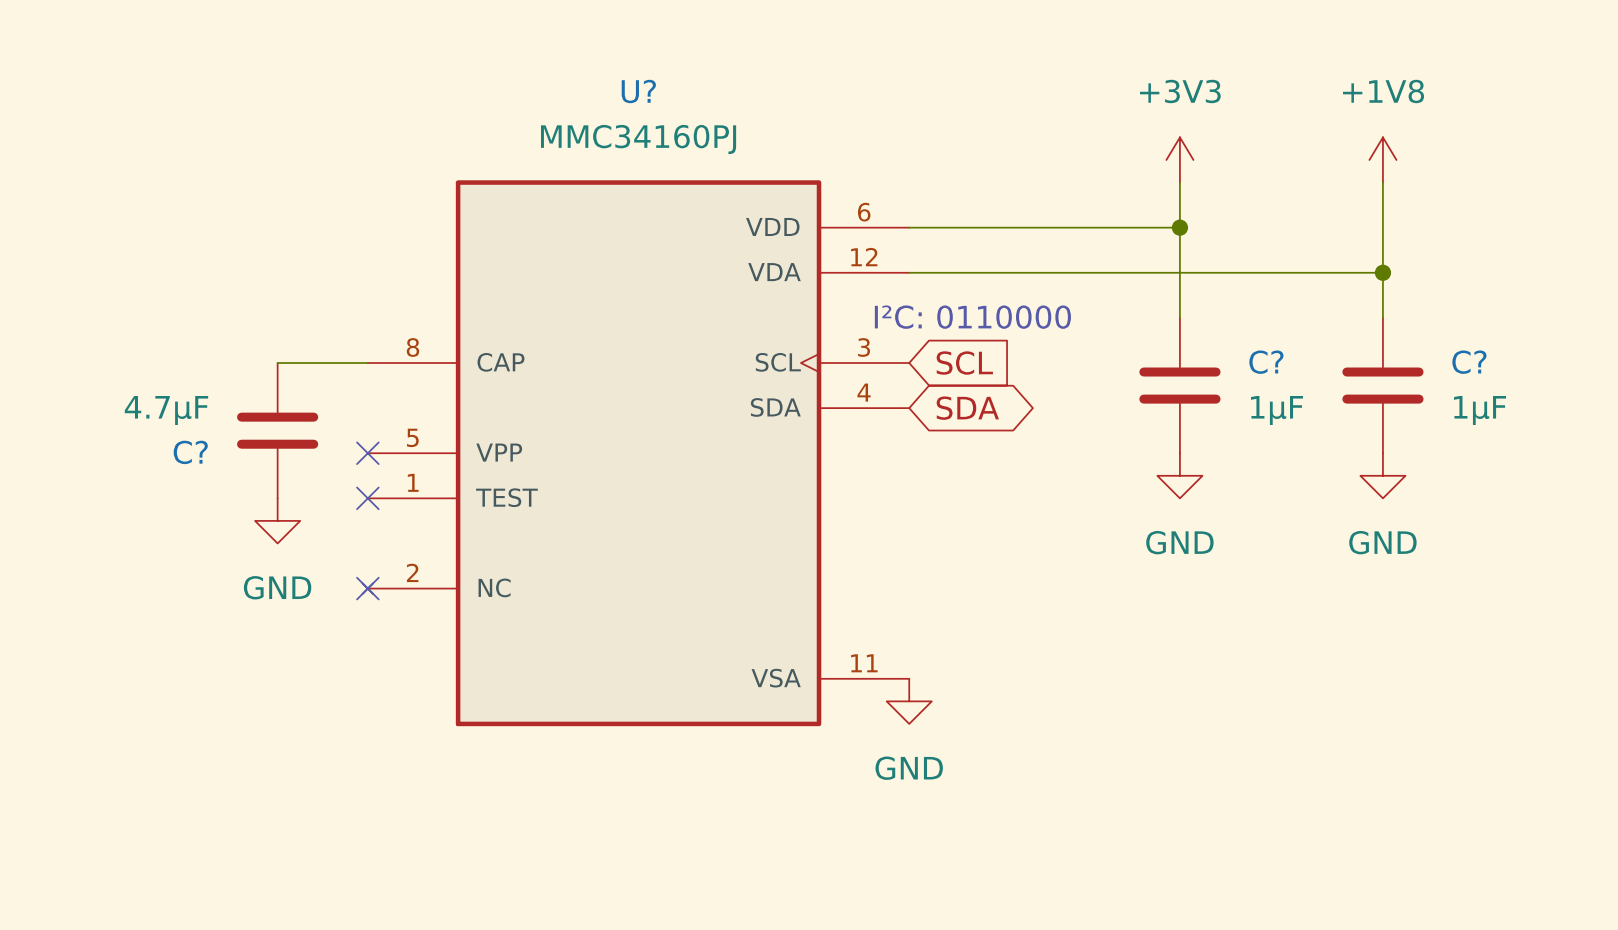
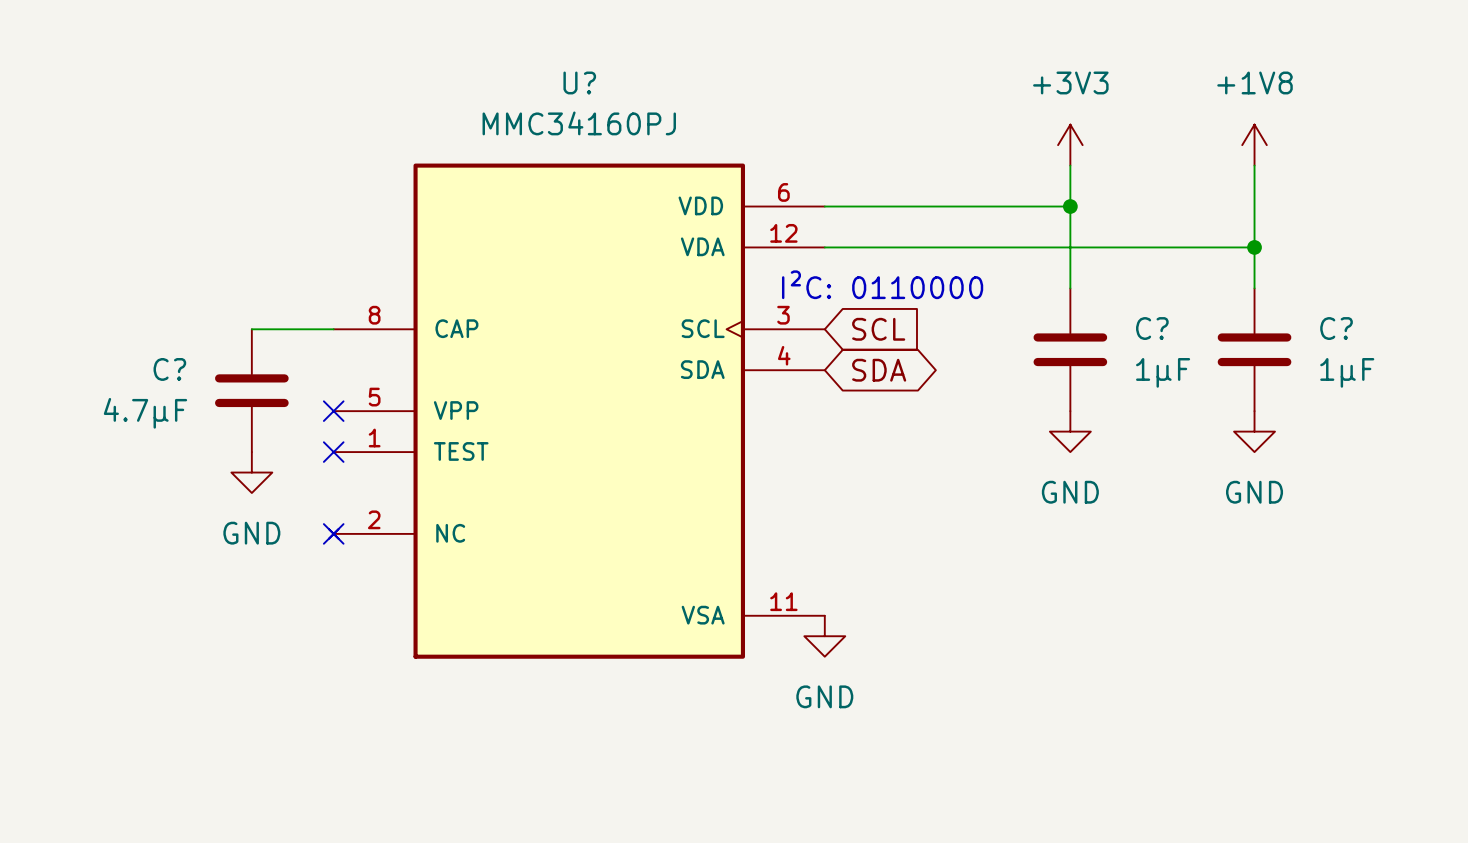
C? value position: 4.7µF (166, 410) -> 4.7µF (145, 413)
C? name position: C? (190, 452) -> C? (169, 369)

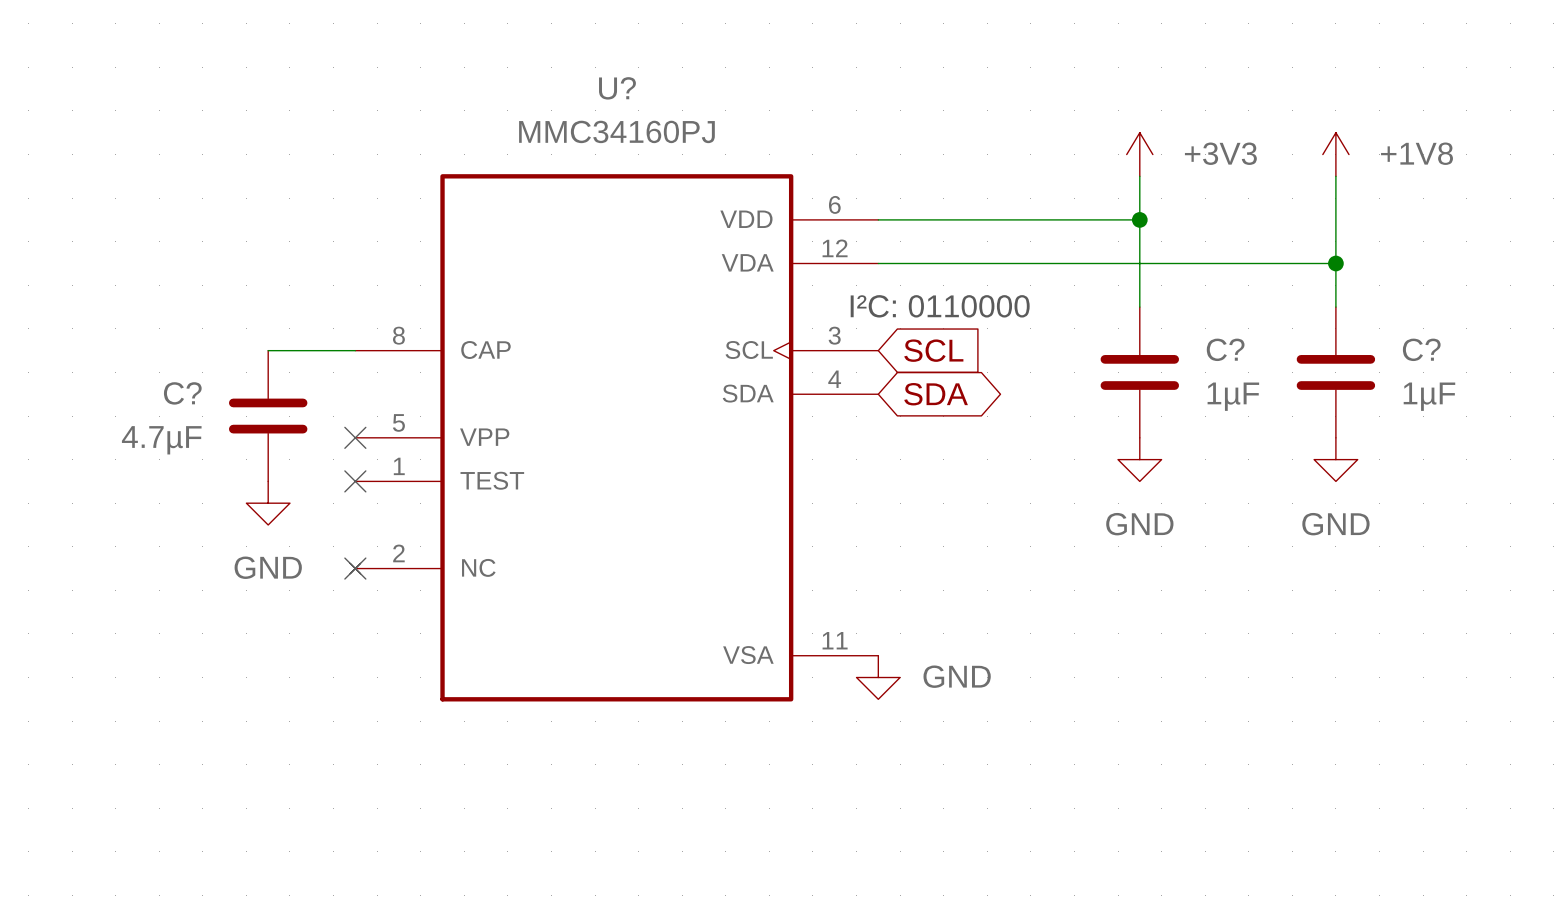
power symbol text position: +3V3 (1070, 82) -> +3V3 (1220, 153)
power symbol text position: +1V8 (1255, 82) -> +1V8 (1417, 153)
power symbol text position: GND (824, 696) -> GND (957, 676)

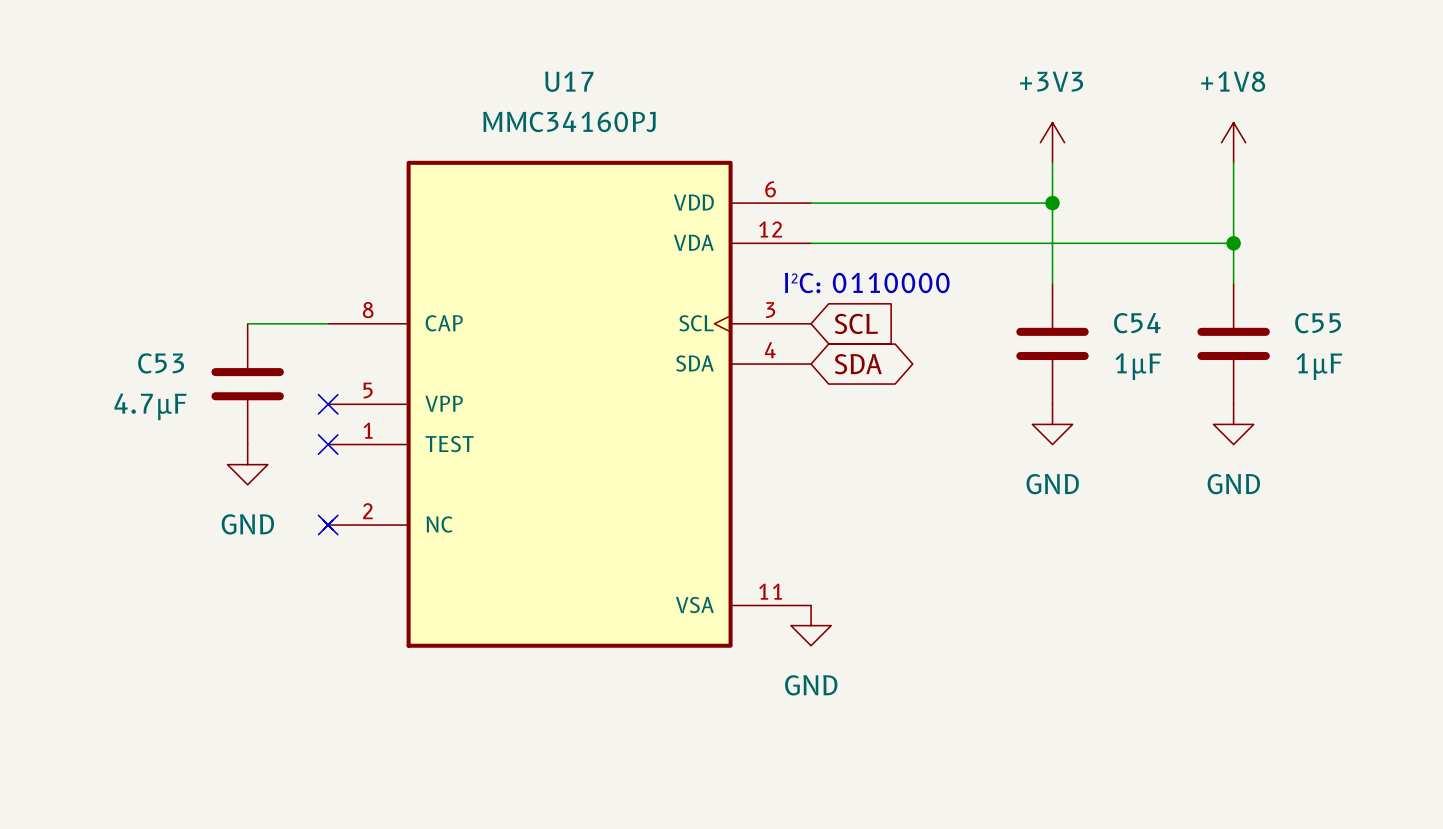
U? name: U? (617, 88) -> U17 (569, 81)
power symbol text position: +3V3 (1220, 153) -> +3V3 (1051, 81)
power symbol text position: +1V8 (1417, 153) -> +1V8 (1233, 81)
C? name: C? (1225, 349) -> C54 (1137, 323)
C? name: C? (1421, 349) -> C55 (1318, 323)
C? name: C? (182, 393) -> C53 (161, 363)
power symbol text position: GND (957, 676) -> GND (811, 685)

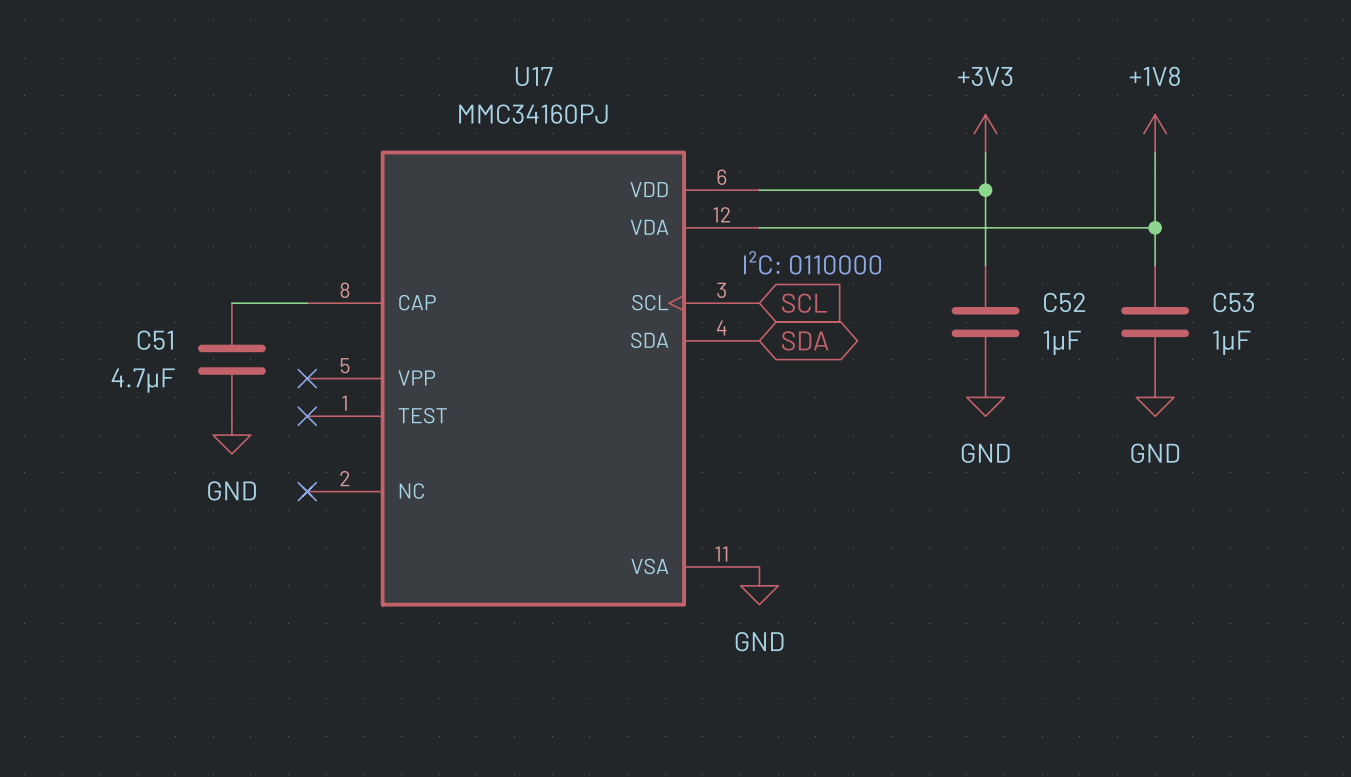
C54 name: C54 (1137, 323) -> C52 (1064, 302)
C55 name: C55 (1318, 323) -> C53 (1233, 302)
C53 name: C53 (161, 363) -> C51 (155, 340)

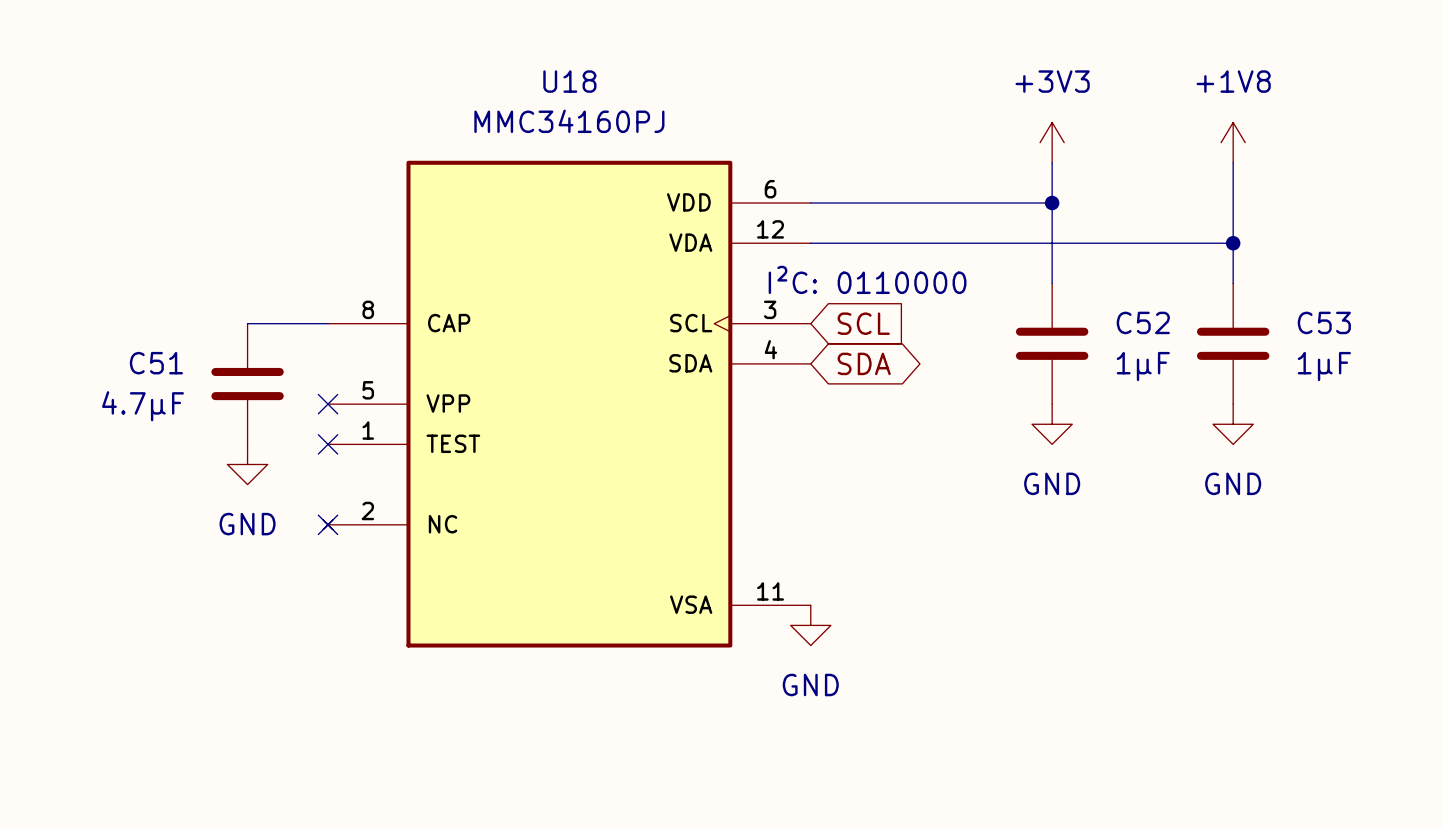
U17 name: U17 (534, 76) -> U18 (569, 81)

